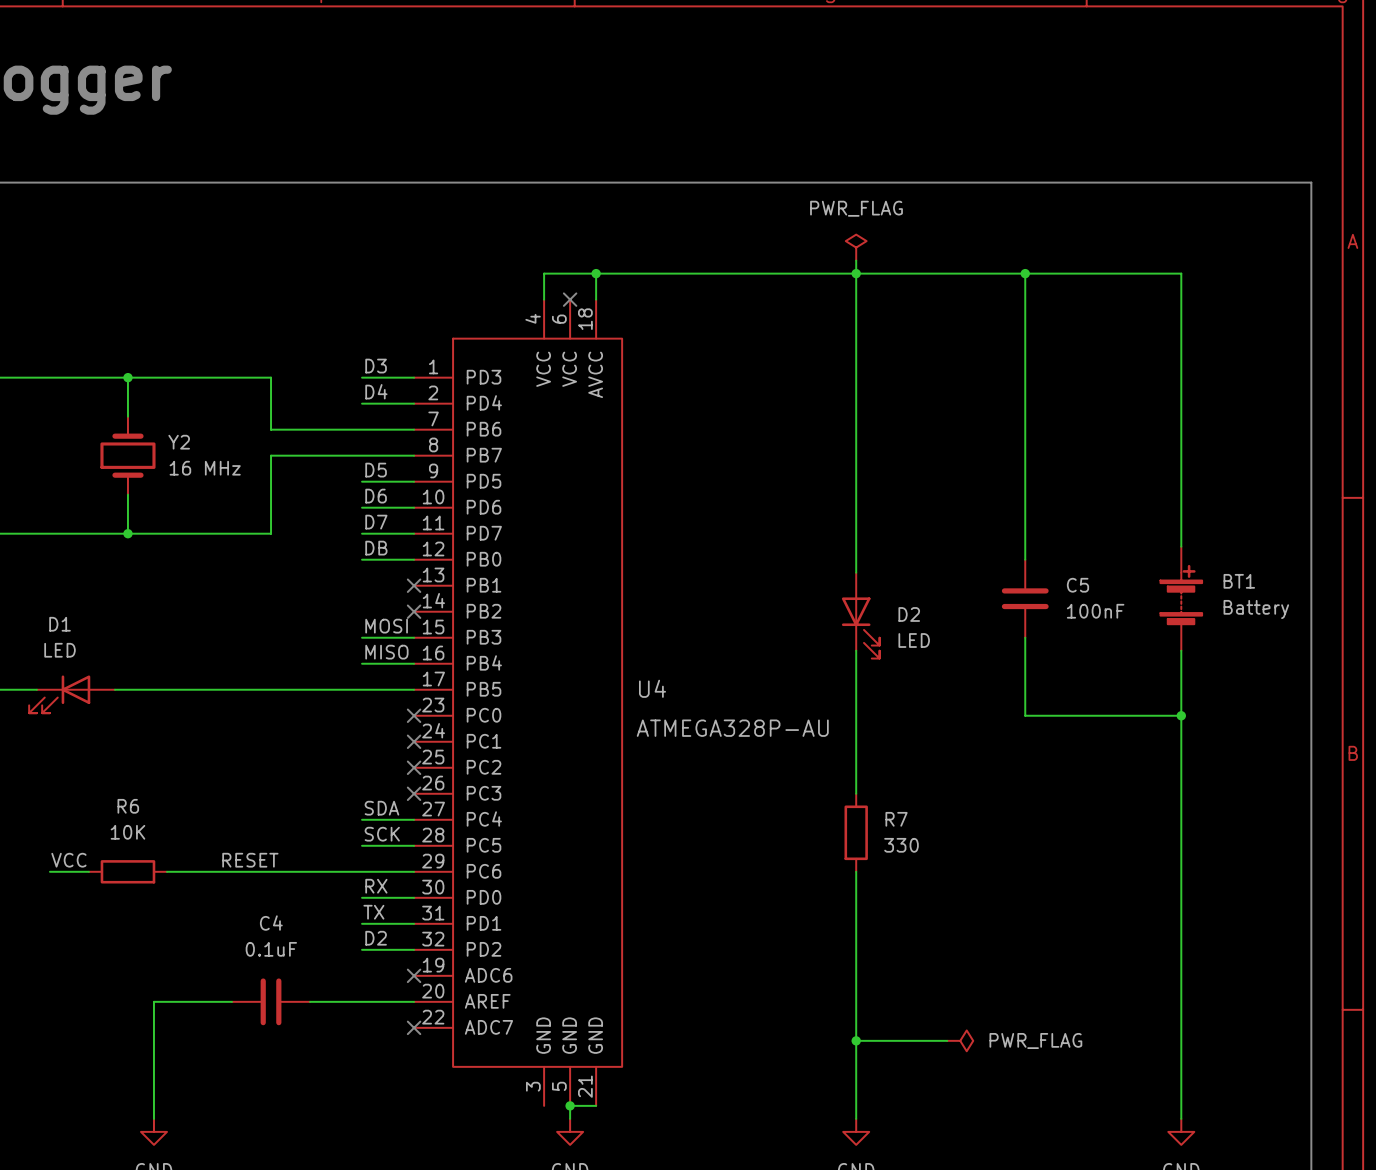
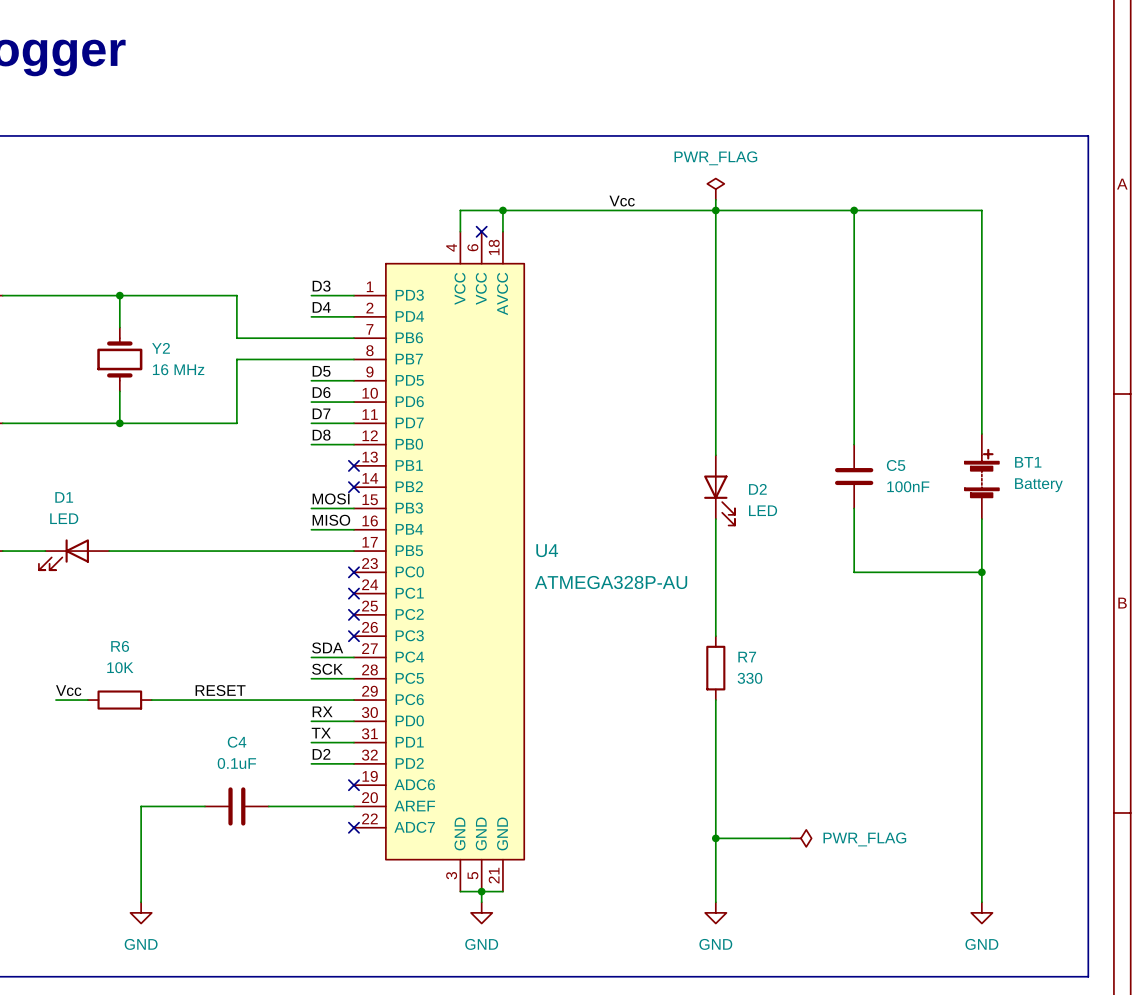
label: none -> Vcc (622, 201)
label: DB (376, 548) -> D8 (321, 435)
label: VCC (68, 860) -> Vcc (68, 690)
wire: none -> (460, 891) (481, 891)

